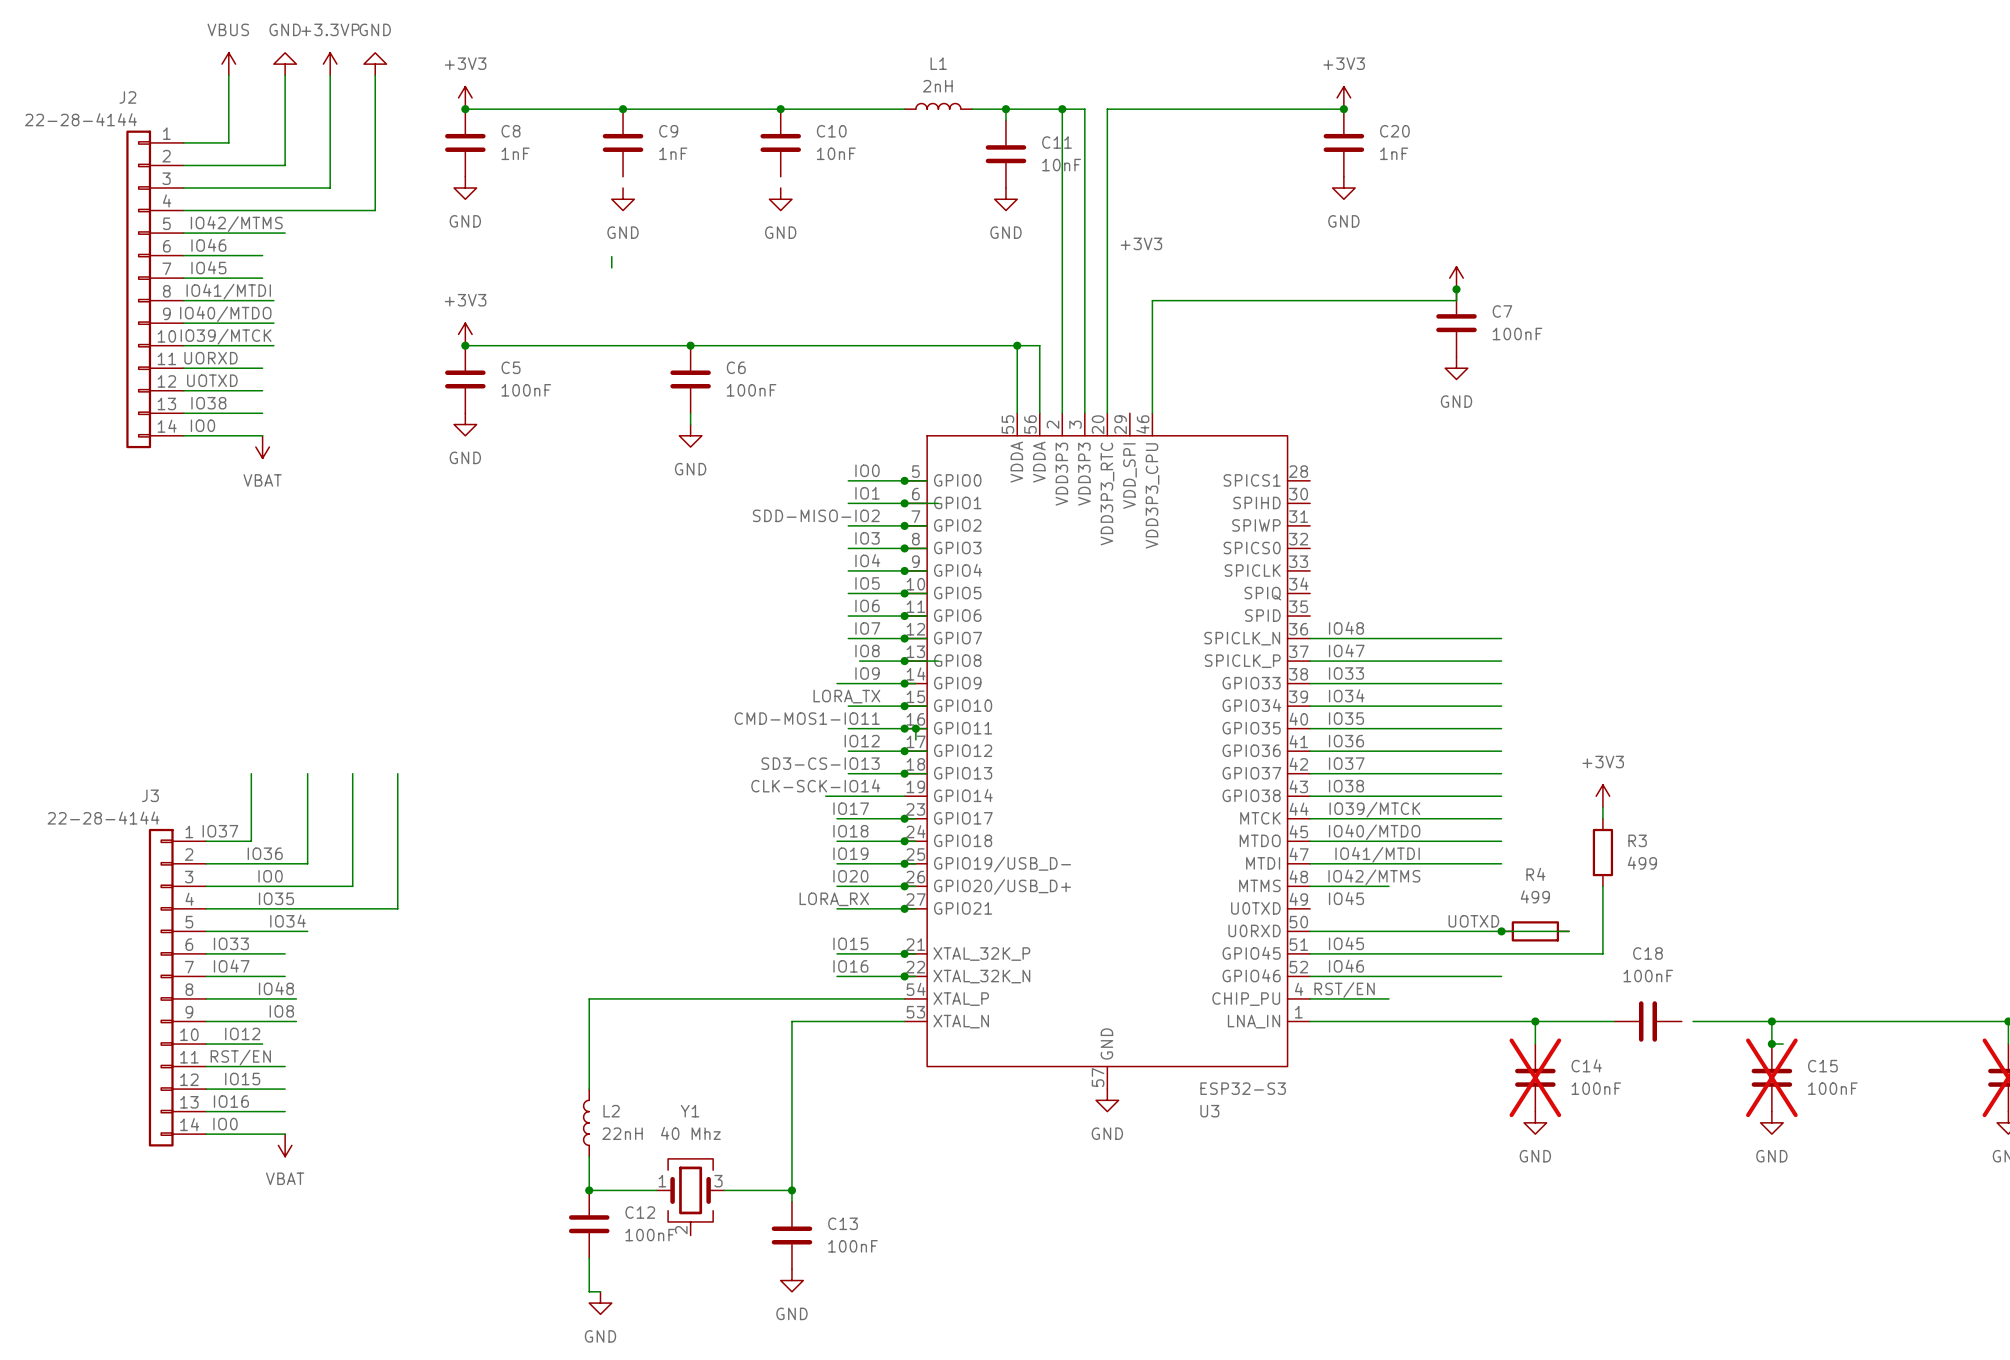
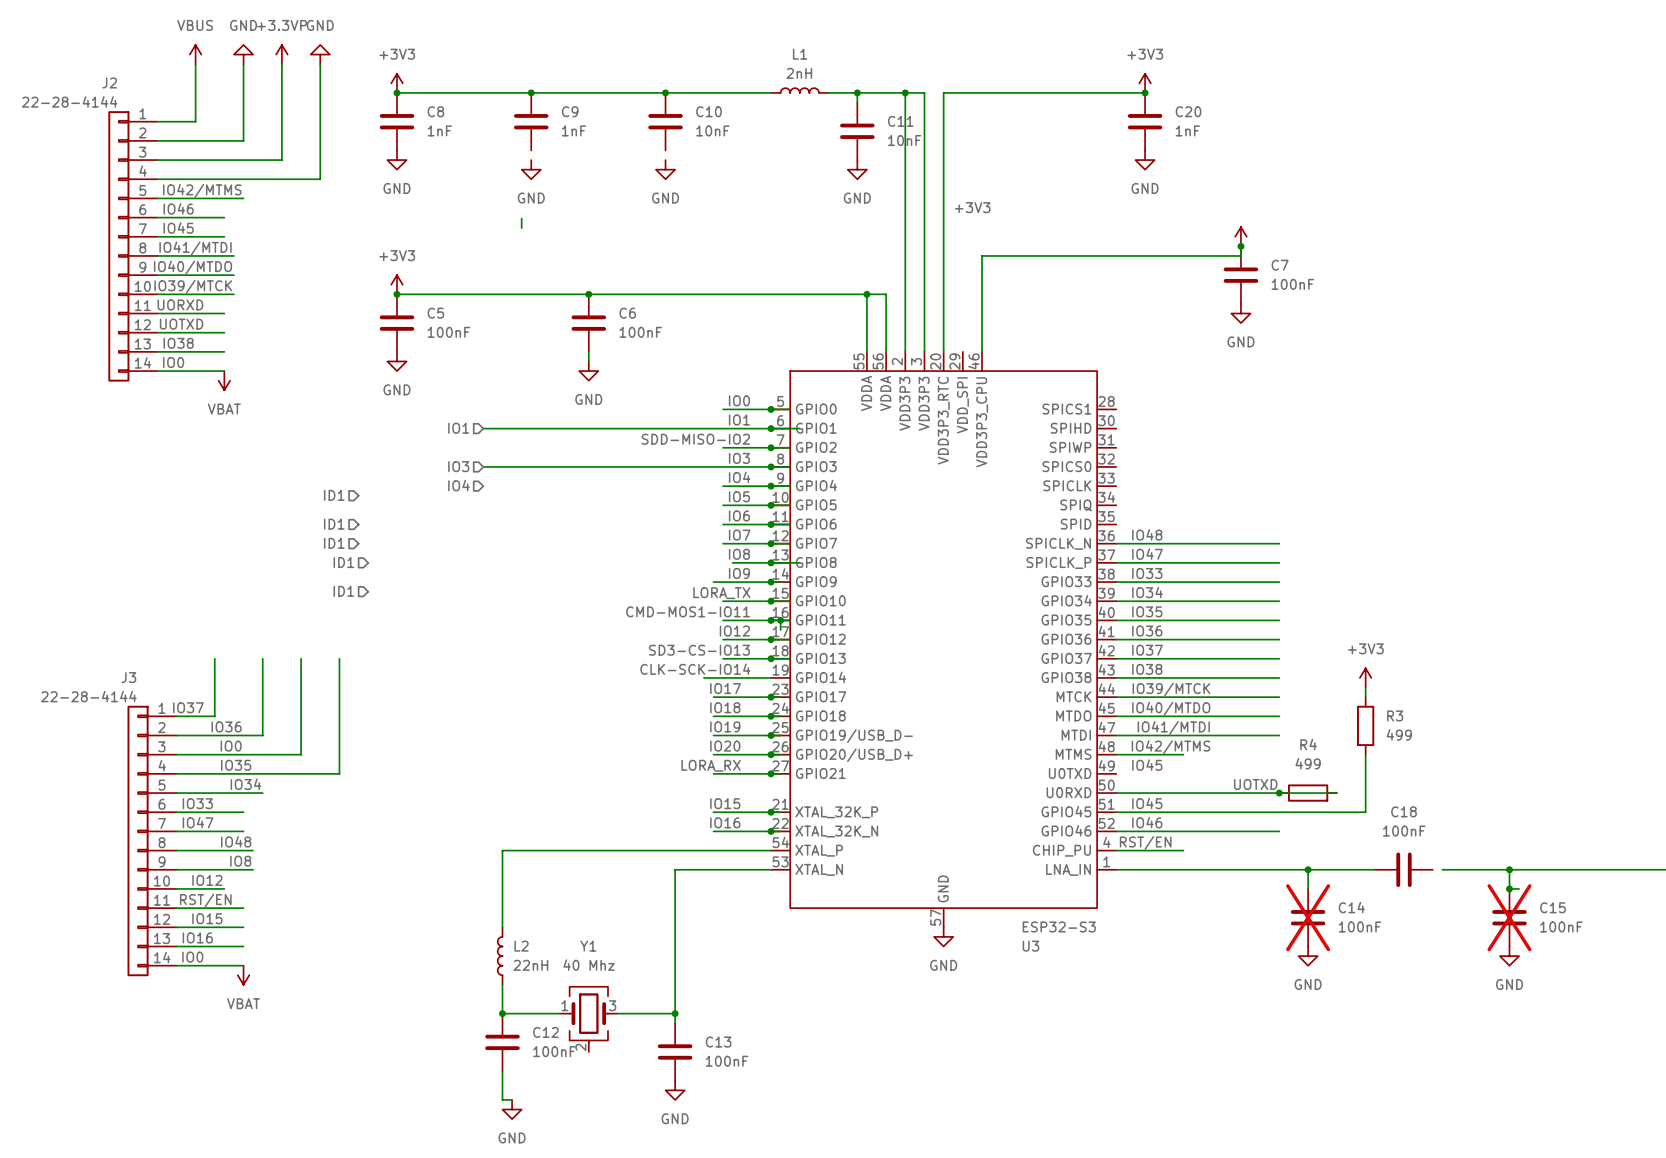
hierarchical label: none -> IO1 (458, 428)
wire: none -> (483, 428) (723, 428)
hierarchical label: none -> IO3 (458, 466)
wire: none -> (483, 466) (723, 466)
hierarchical label: none -> IO4 (458, 485)
hierarchical label: none -> ID1 (334, 495)
hierarchical label: none -> ID1 (334, 524)
hierarchical label: none -> ID1 (334, 543)
hierarchical label: none -> ID1 (343, 562)
hierarchical label: none -> ID1 (343, 591)

